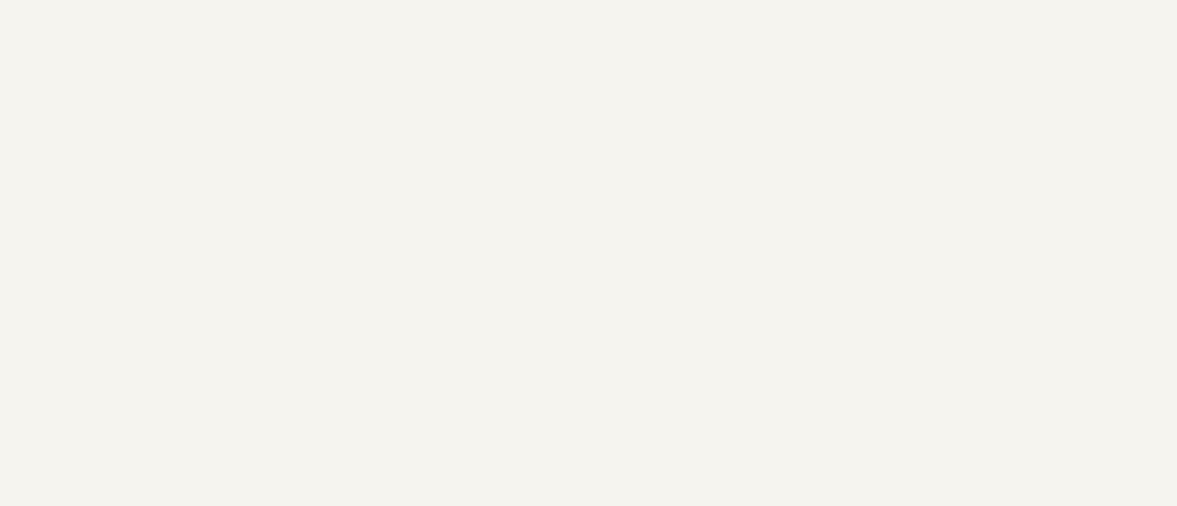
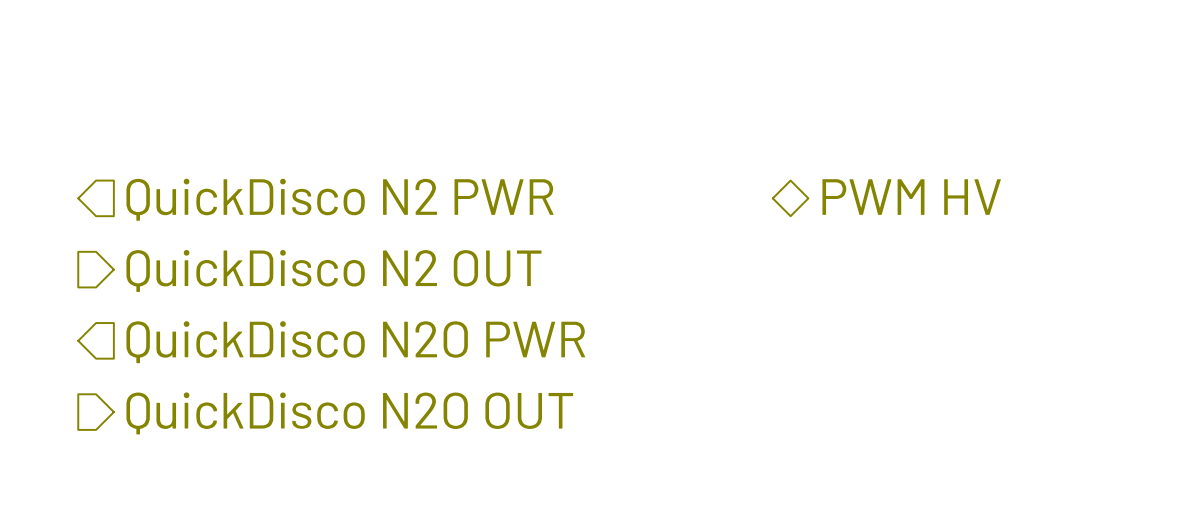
hierarchical label: none -> PWM HV (911, 197)
hierarchical label: none -> QuickDisco N2 PWR (339, 199)
hierarchical label: none -> QuickDisco N2 OUT (333, 270)
hierarchical label: none -> QuickDisco N2O PWR (355, 342)
hierarchical label: none -> QuickDisco N2O OUT (349, 413)

